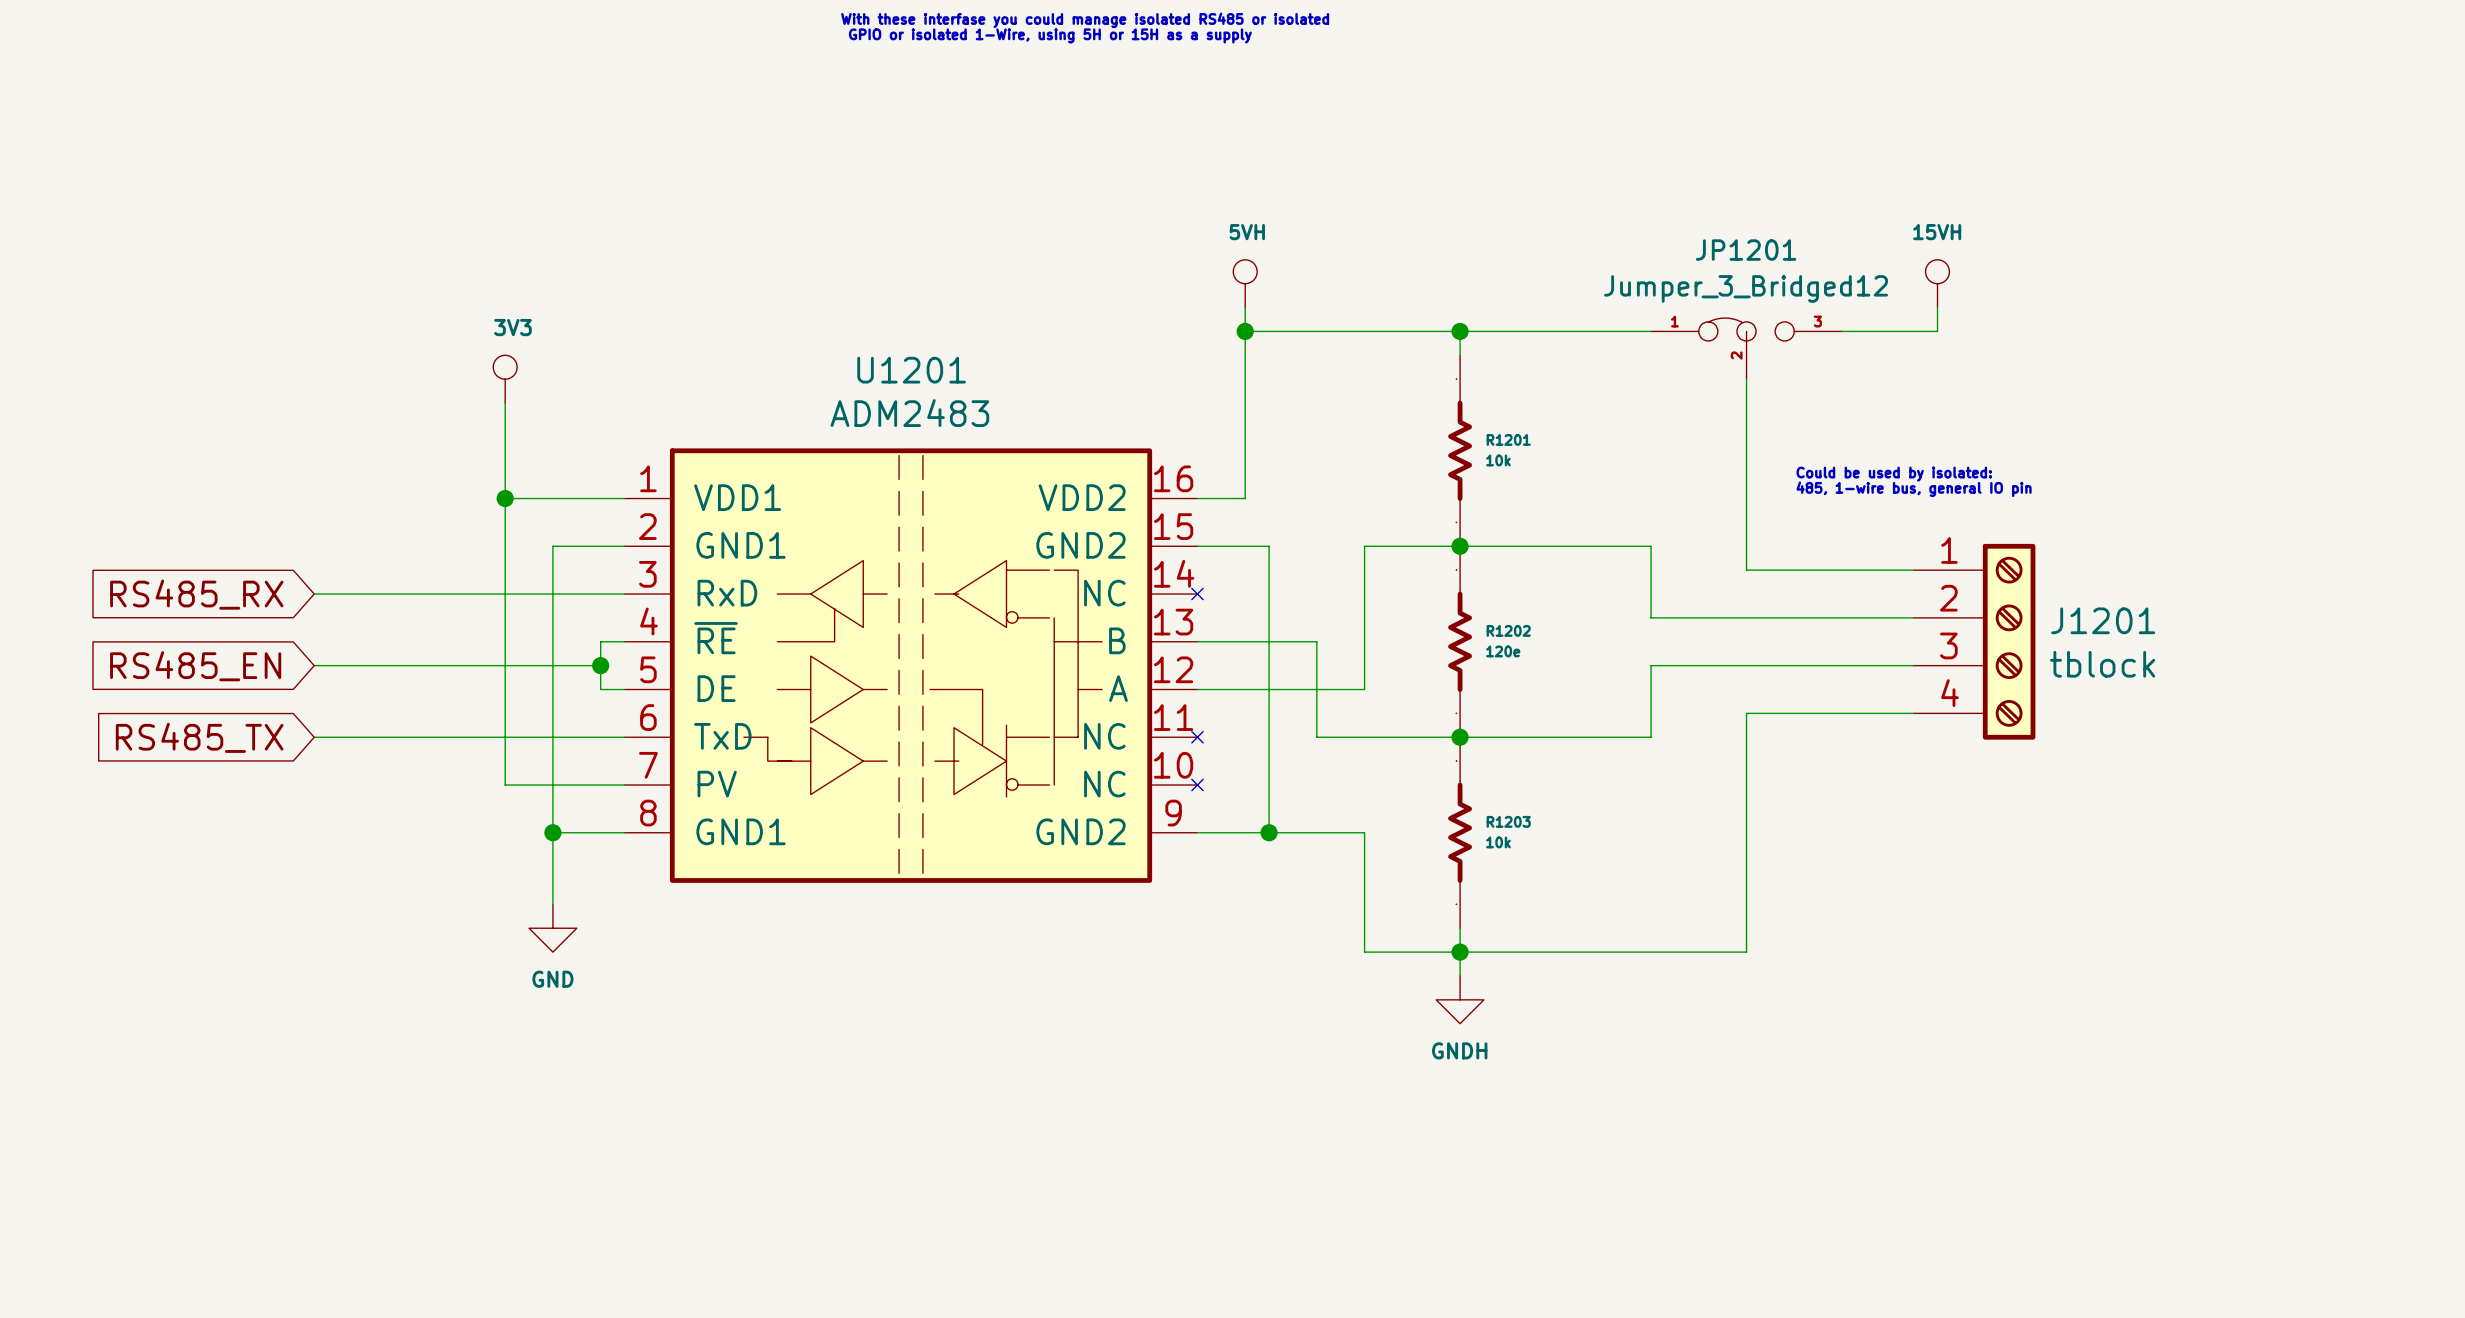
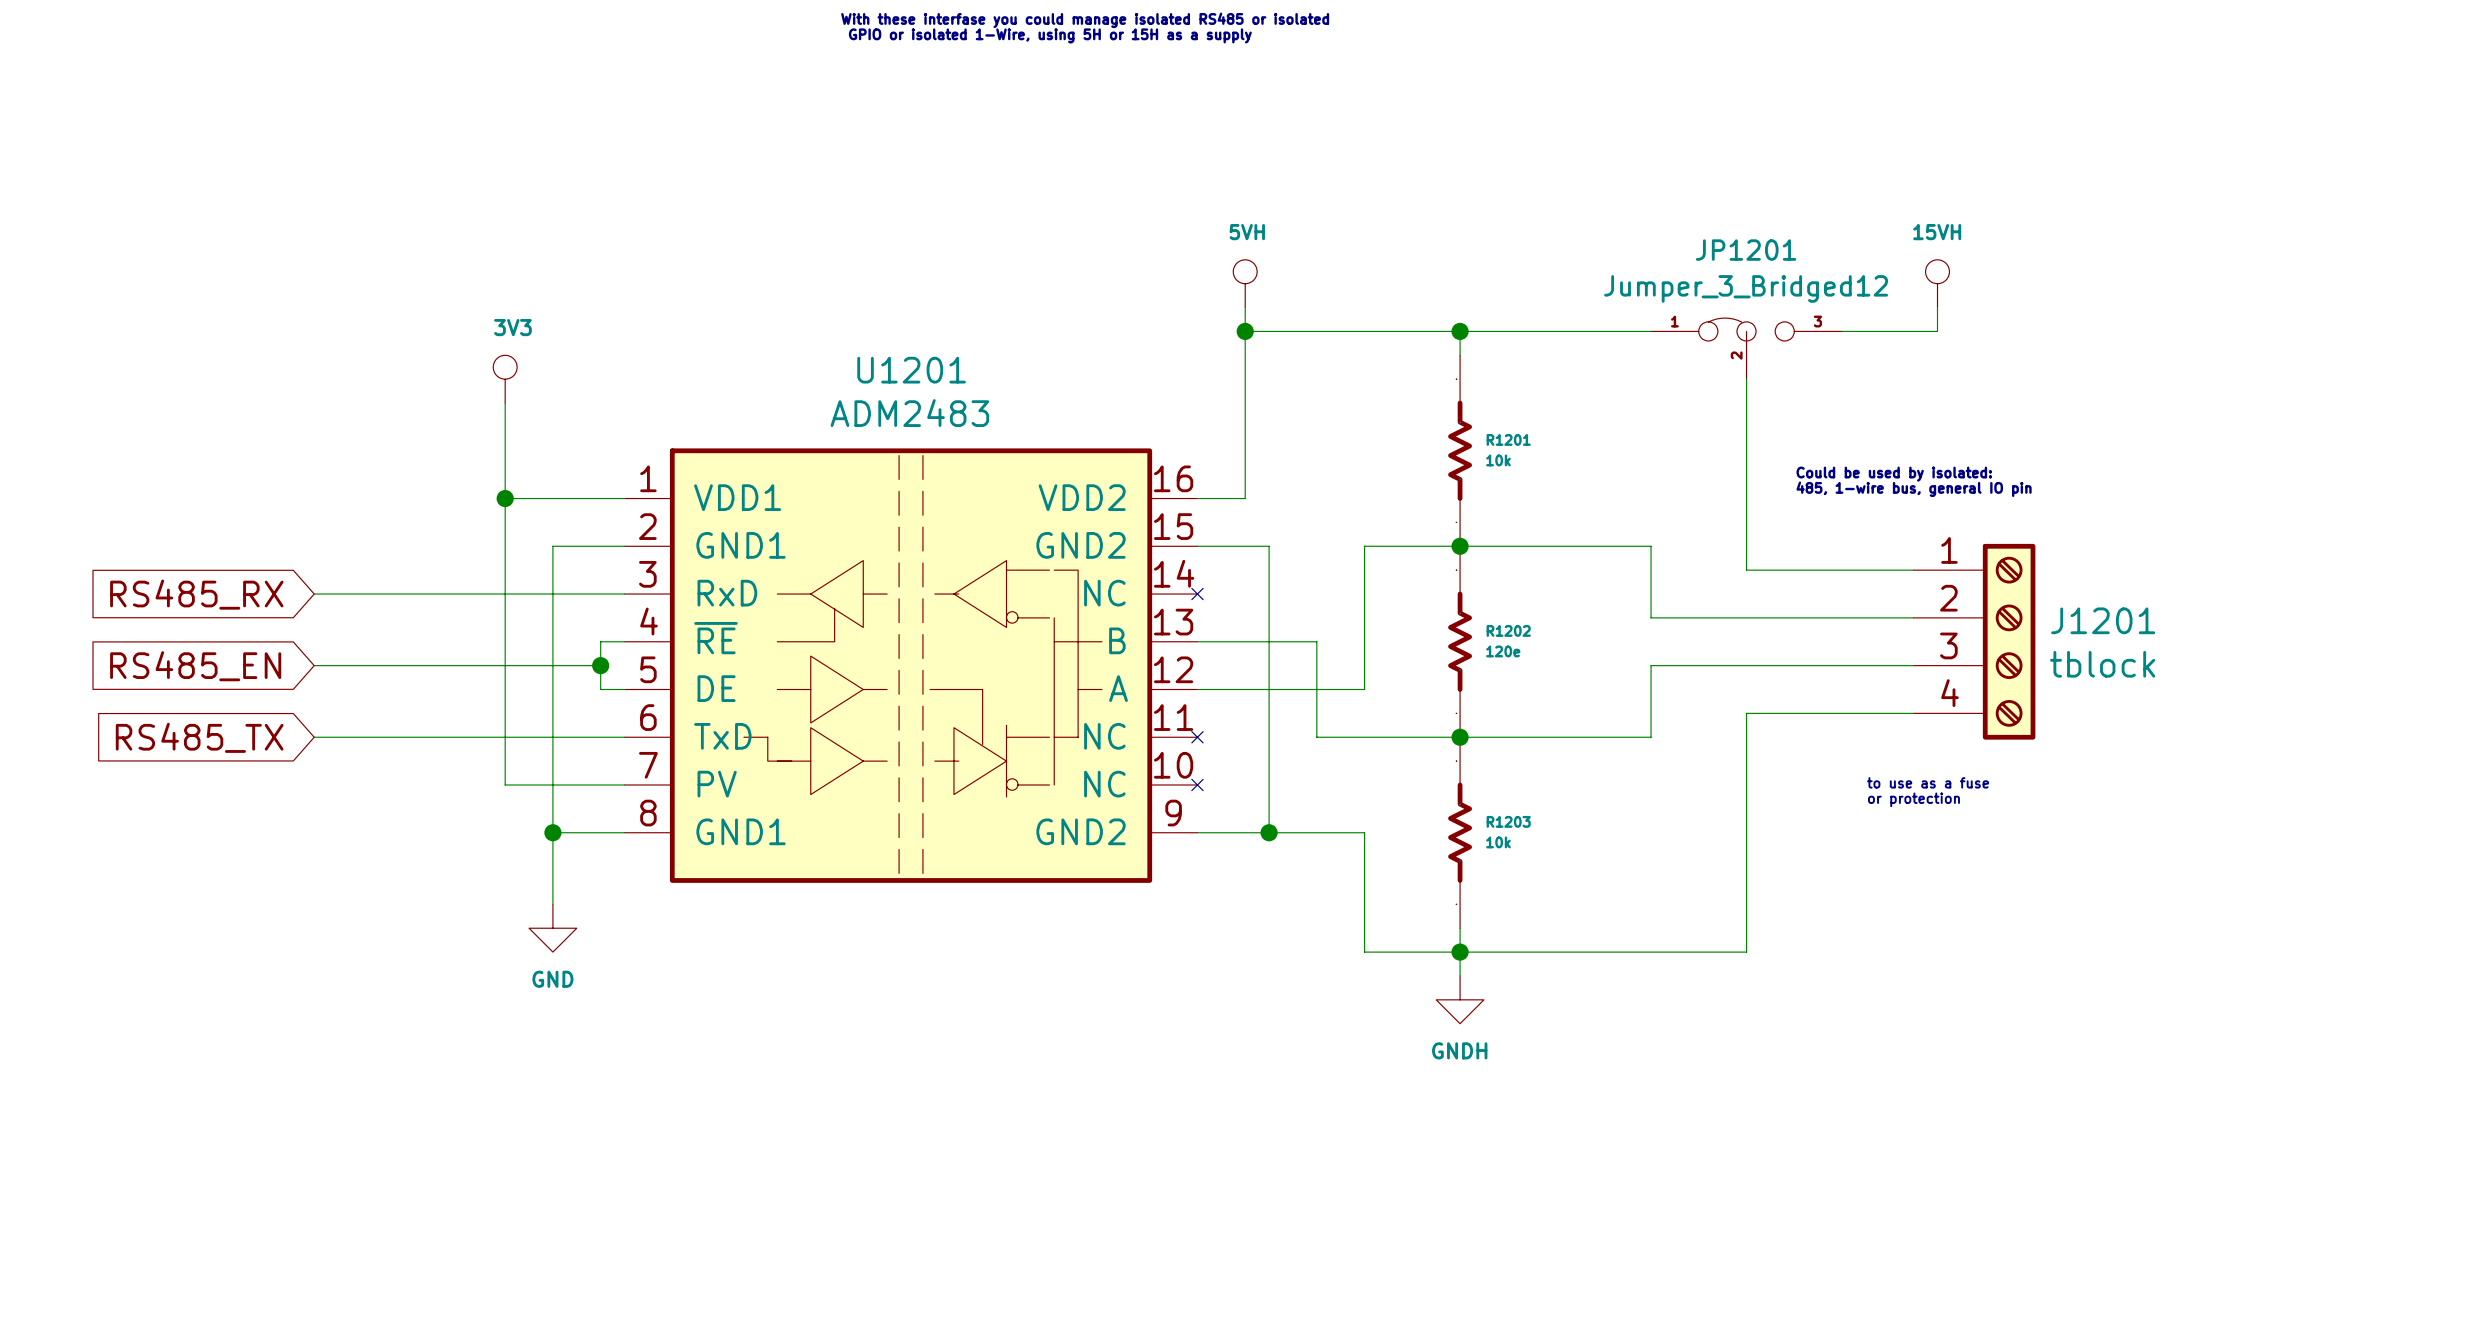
text: none -> to use as a fuse (1928, 782)
text: none -> or protection (1913, 799)

